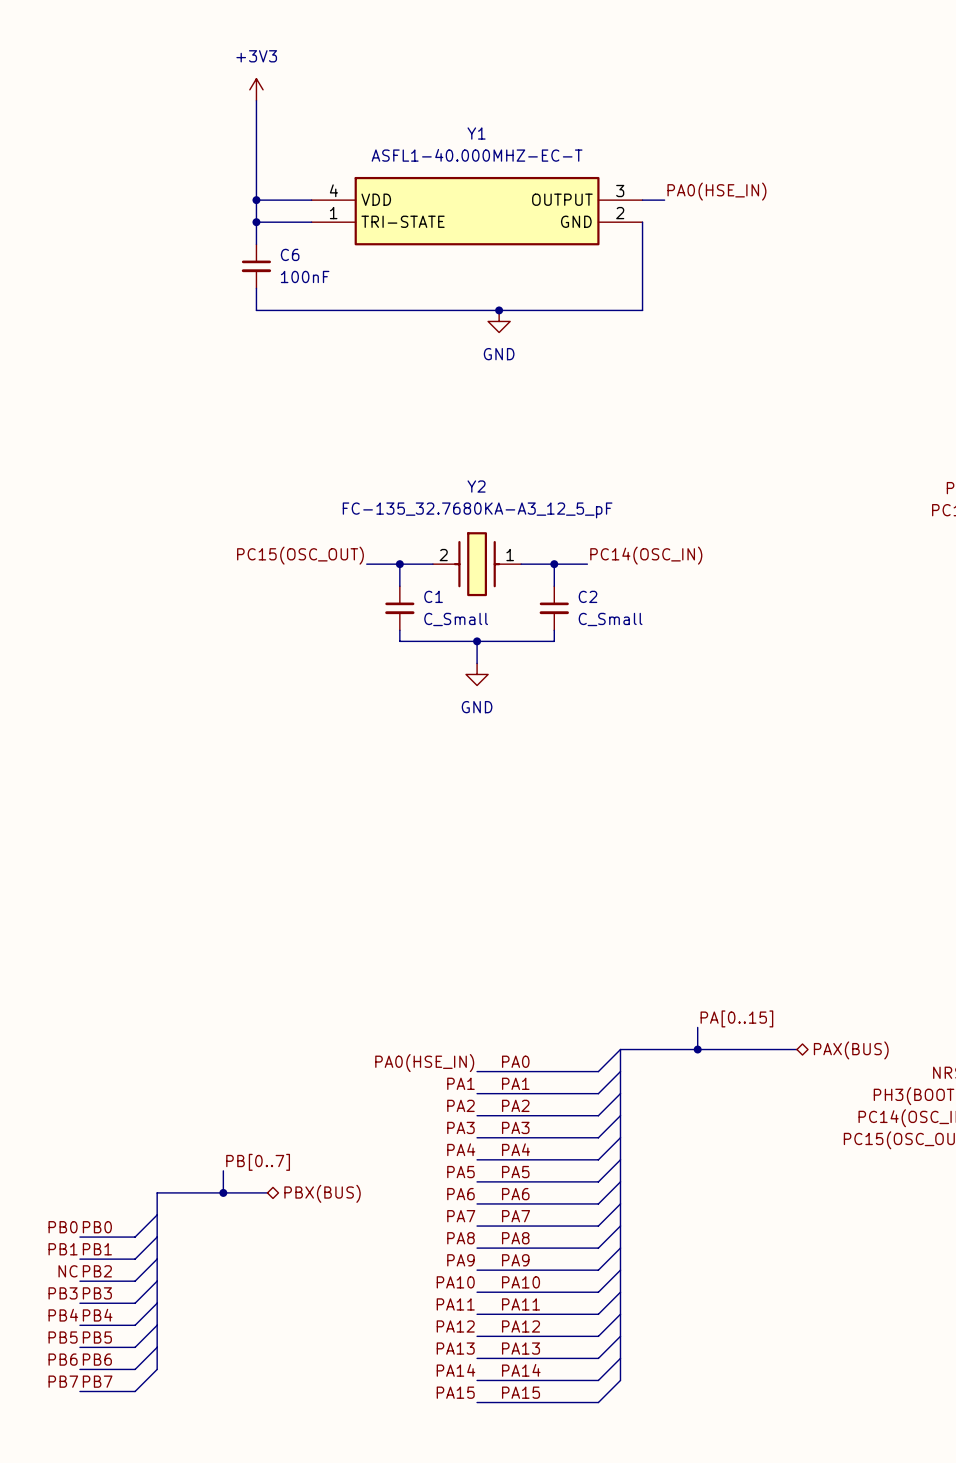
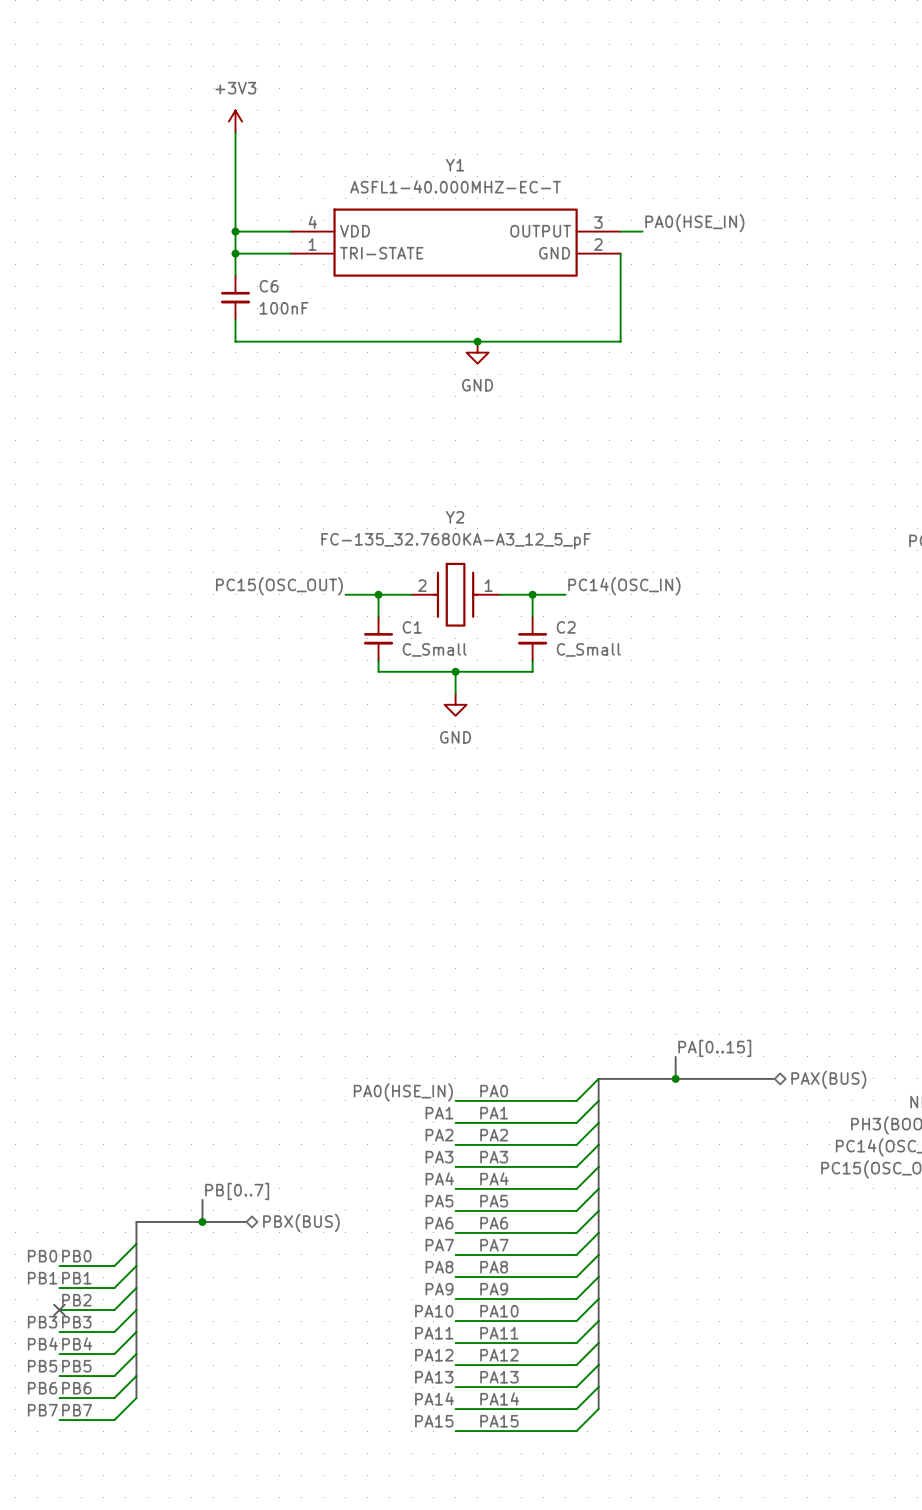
label: NC (68, 1271) -> none
no-connect mark: none -> (59, 1310)

